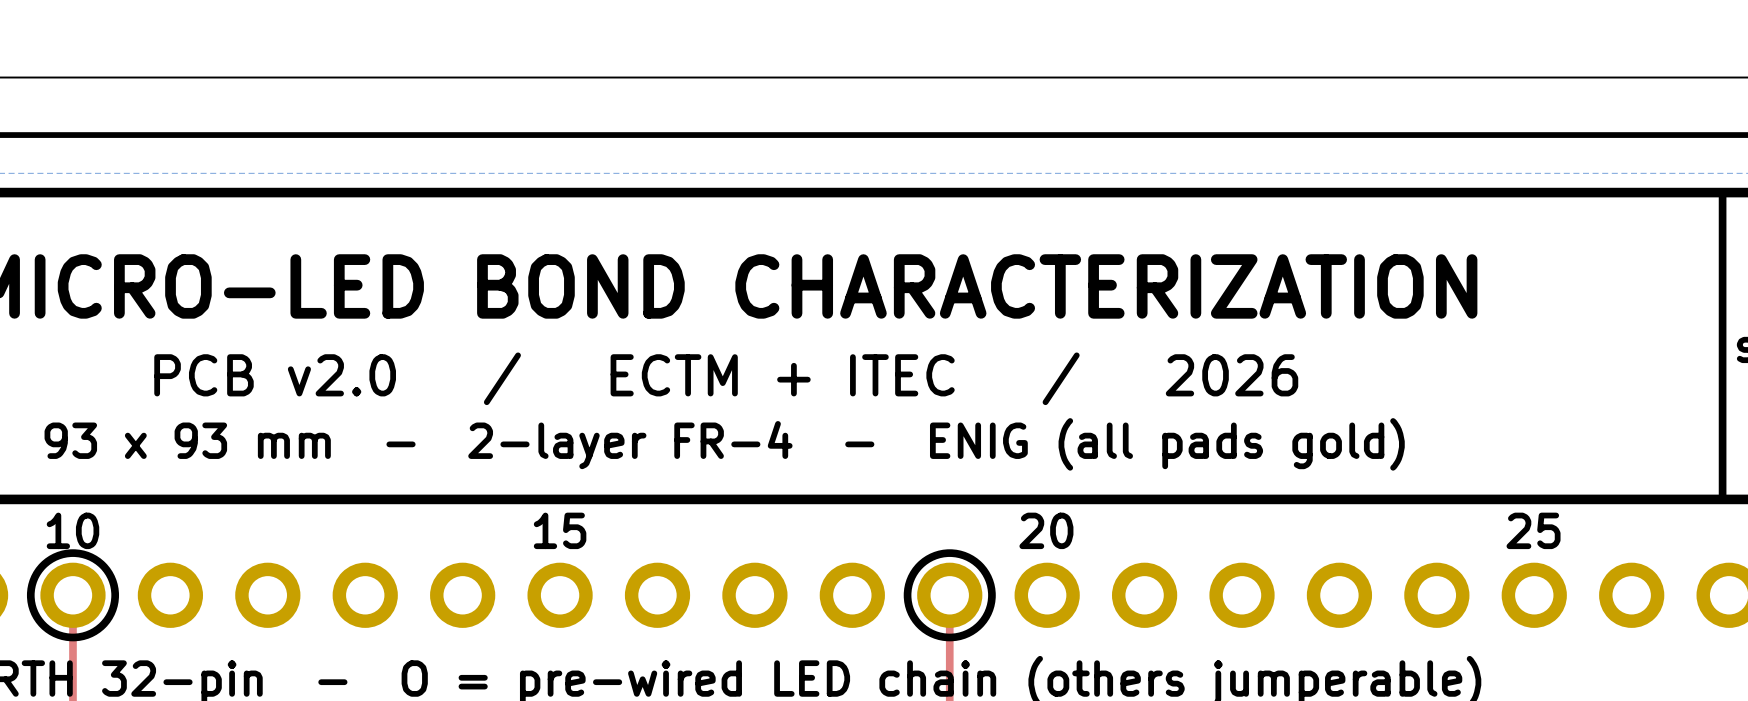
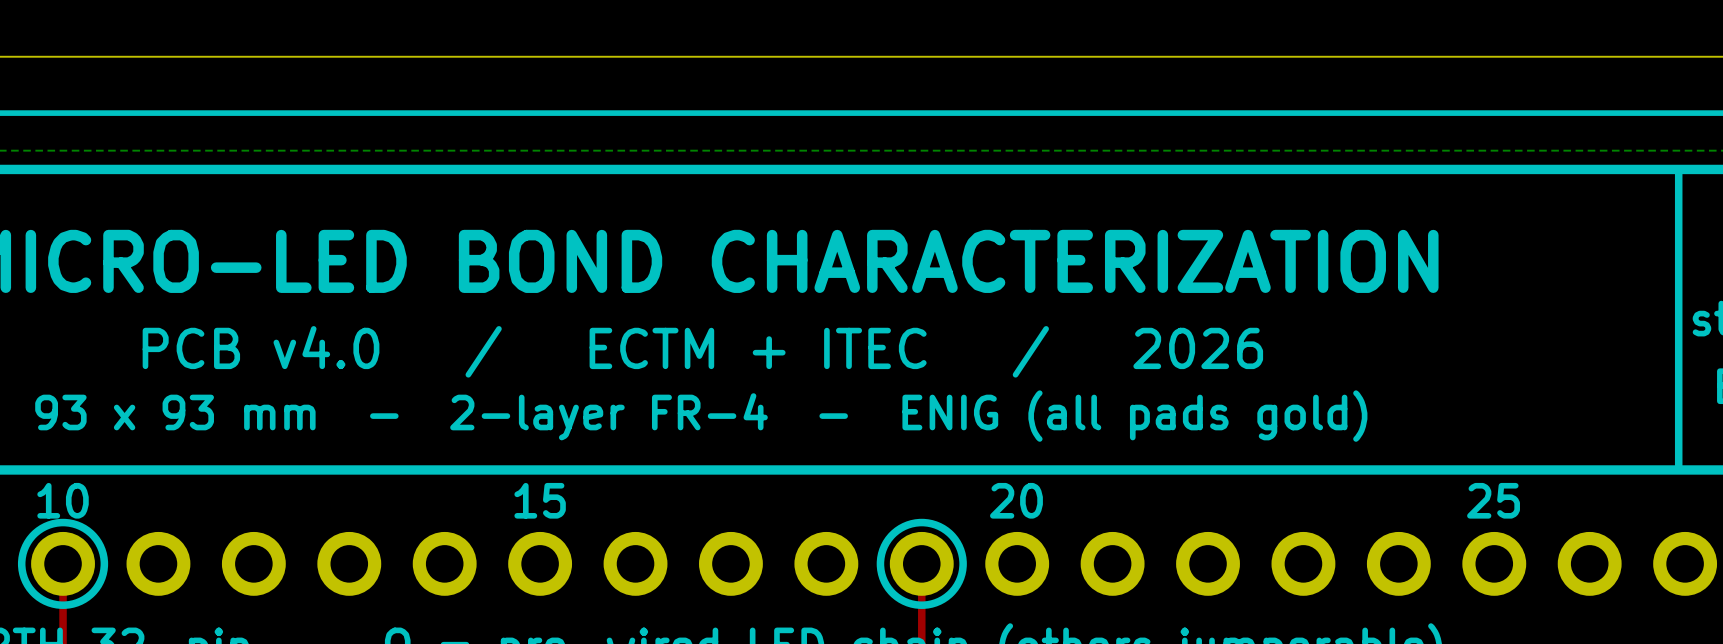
text: PCB v2.0 / ECTM + ITEC / 2026 (726, 378) -> PCB v4.0 / ECTM + ITEC / 2026 (702, 351)

